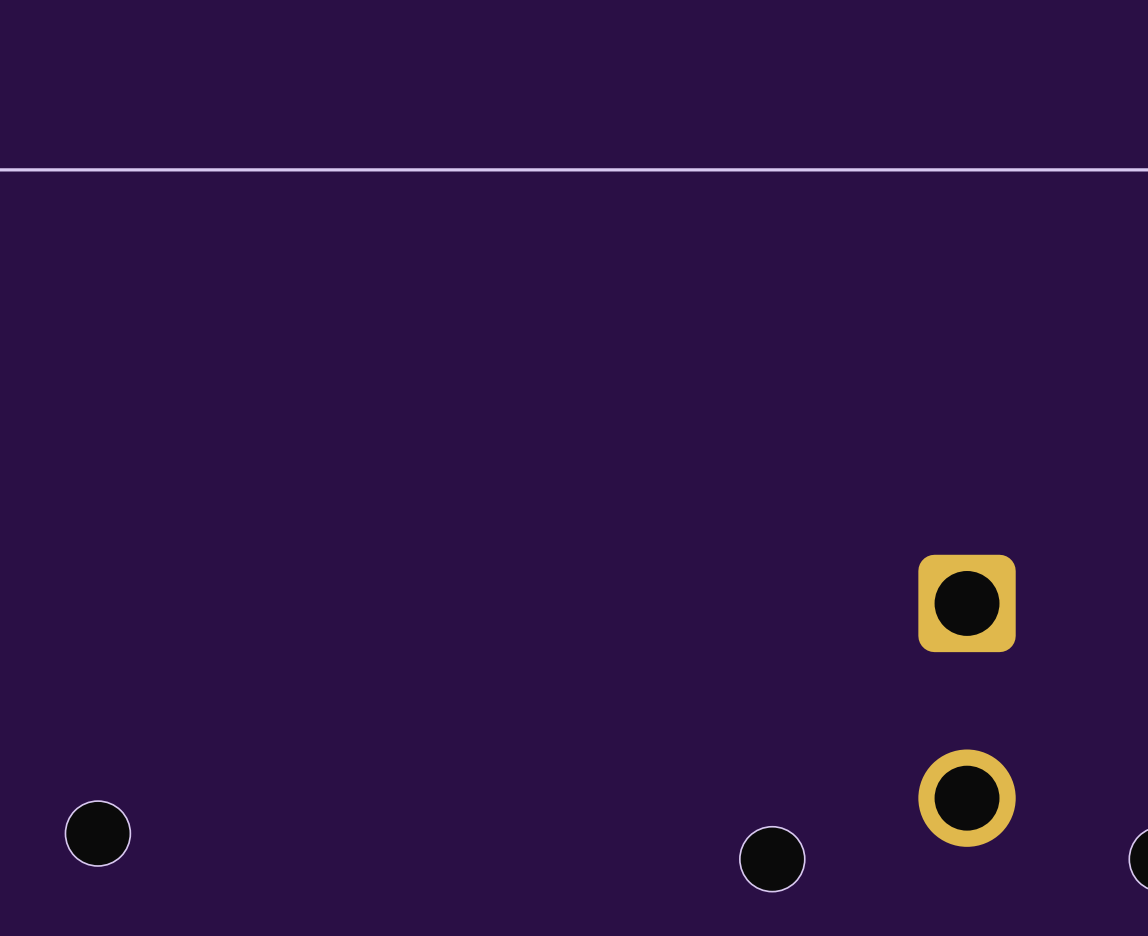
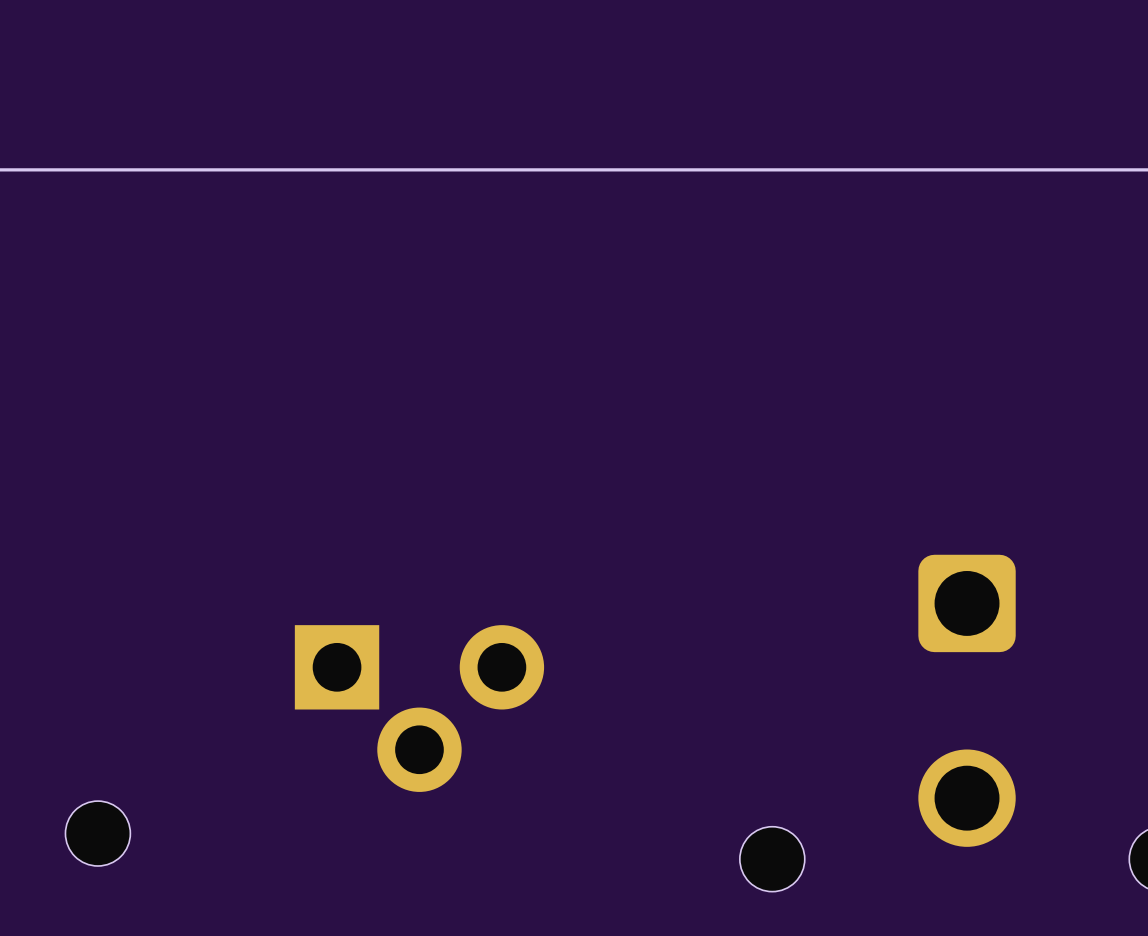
part: none -> (419, 708)

